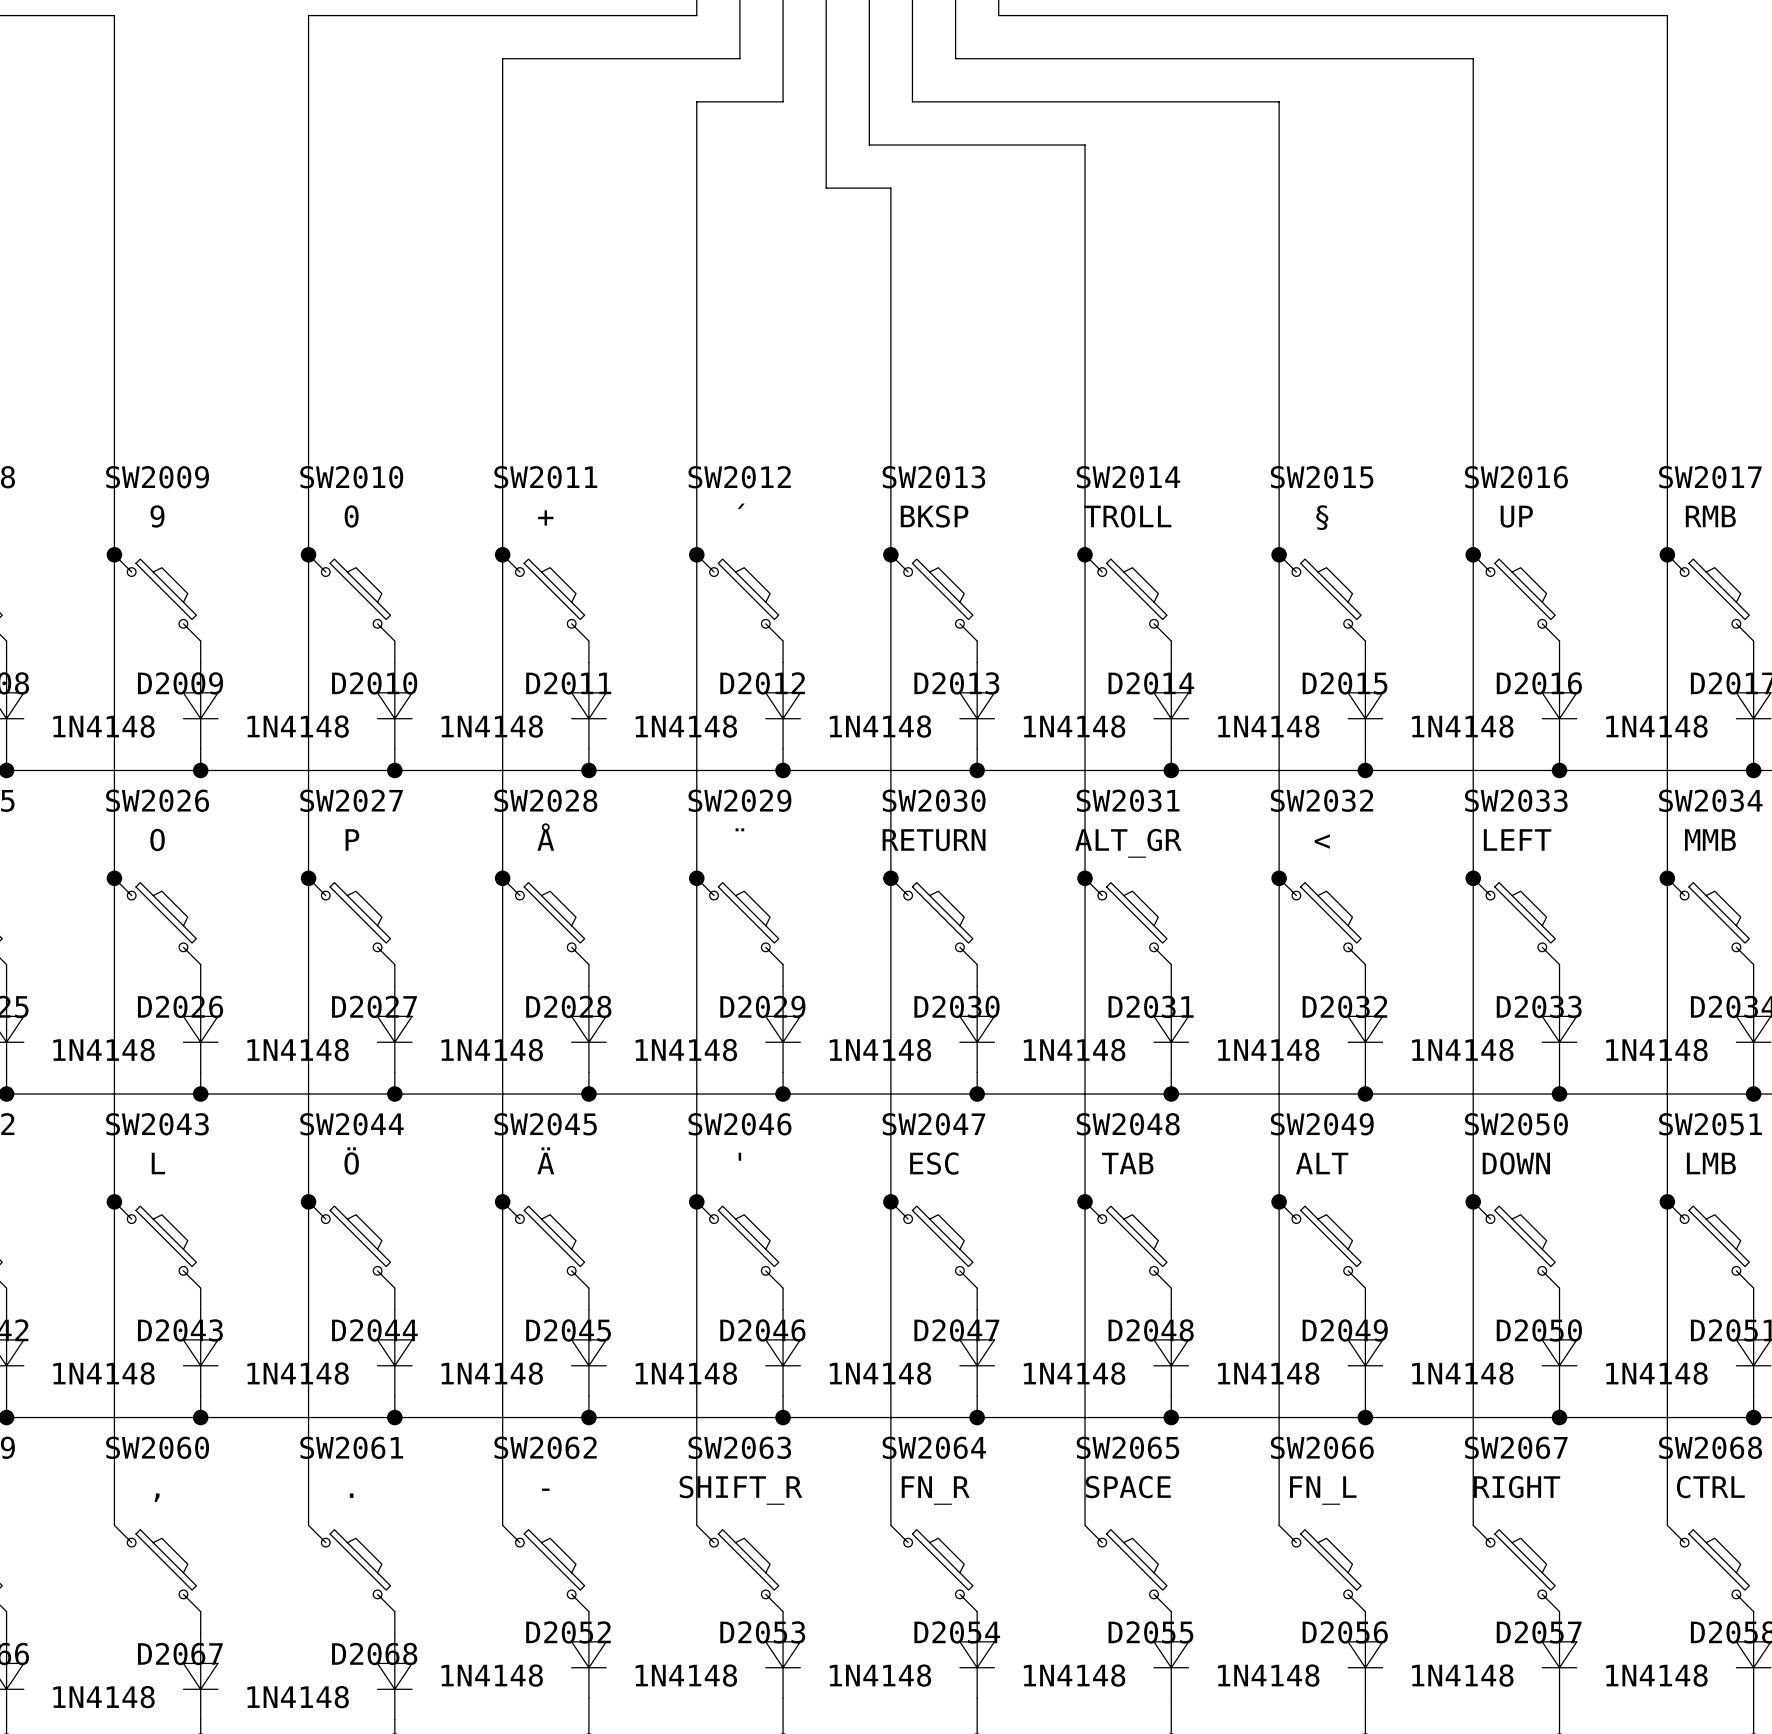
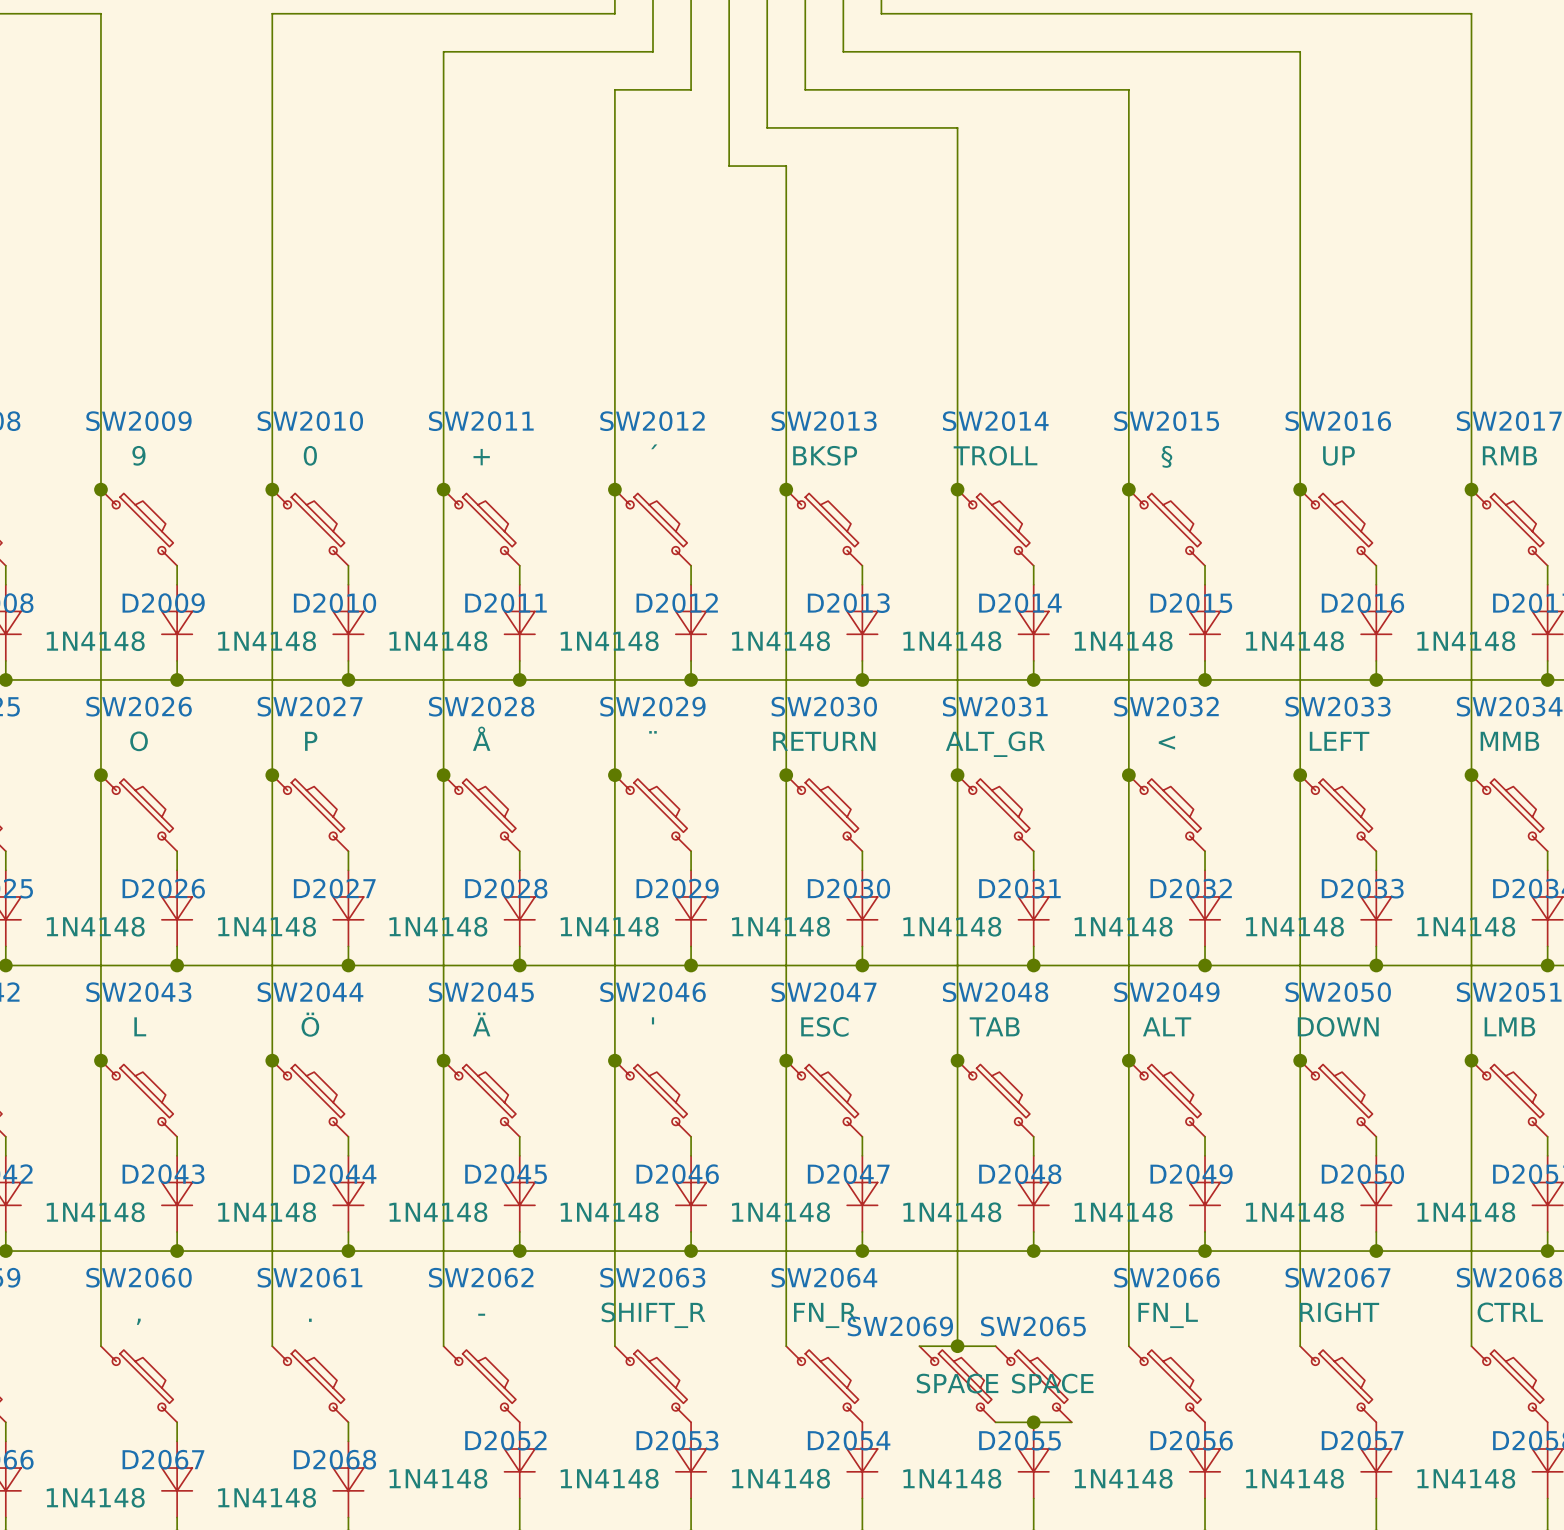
SW2065 name position: SW2065 (1127, 1447) -> SW2065 (1033, 1326)
SW2065 value position: SPACE (1128, 1487) -> SPACE (1052, 1383)
wire: none -> (919, 1346) (995, 1346)
junction: none -> (957, 1346)
SW2069: none -> SPACE (957, 1384)
SW2065 position: (1128, 1568) -> (1033, 1384)
wire: none -> (995, 1422) (1071, 1422)
junction: none -> (1033, 1422)

